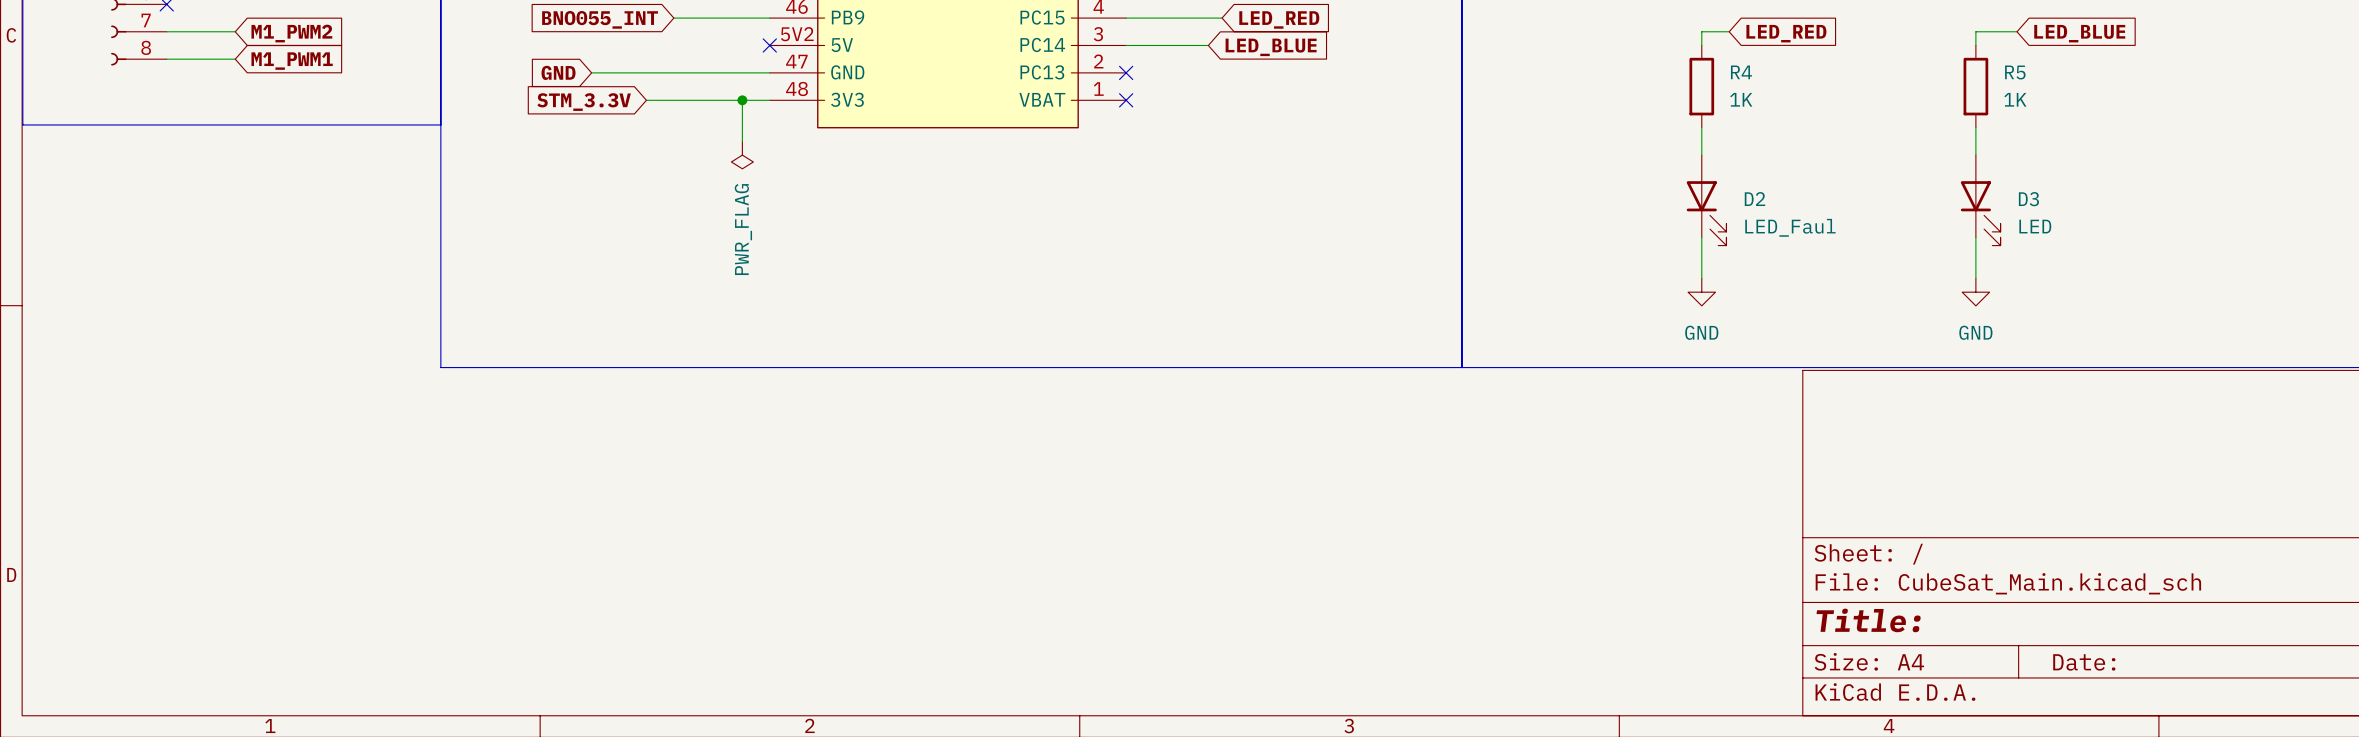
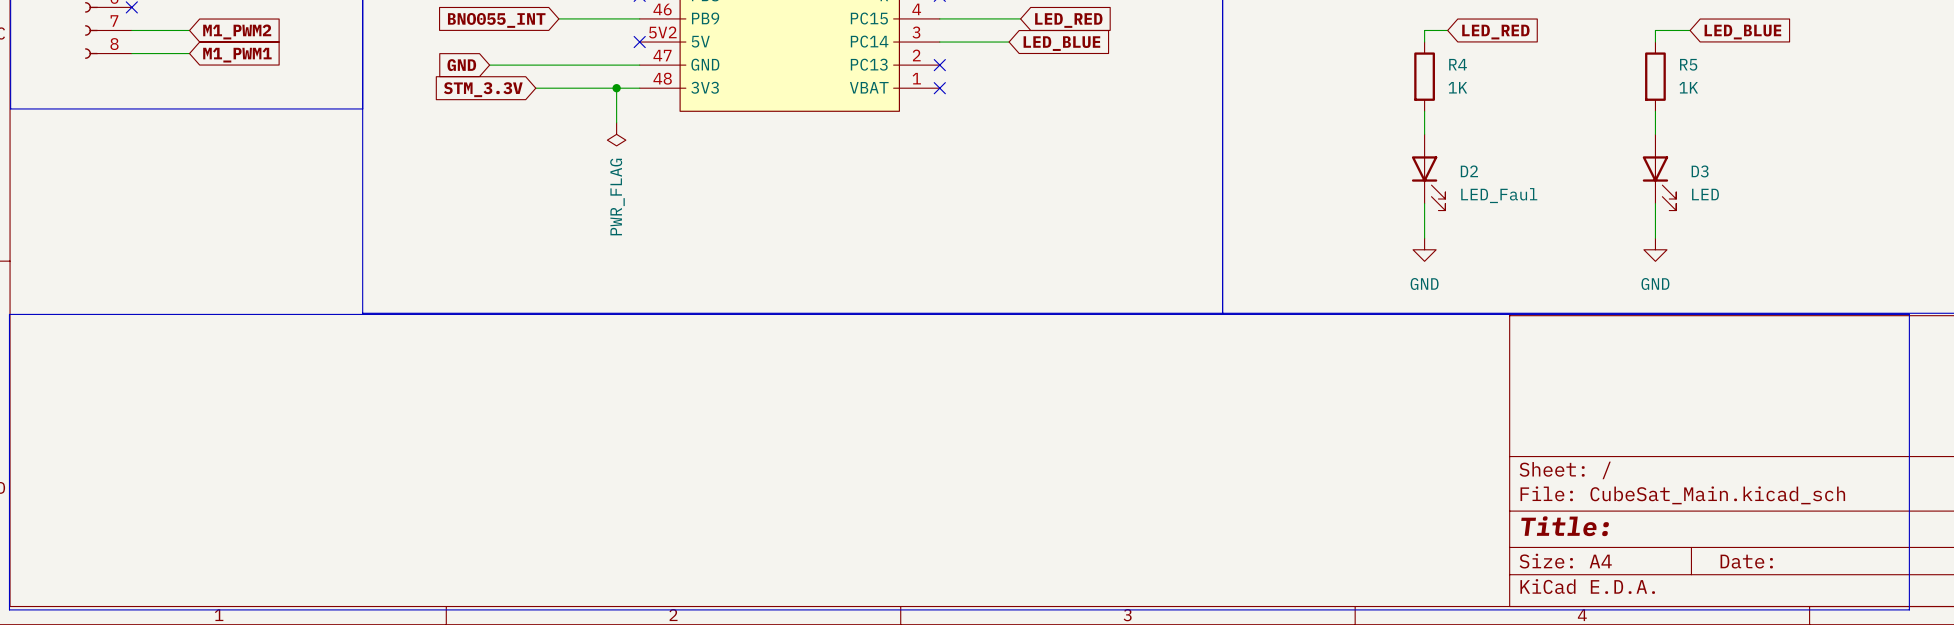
line: none -> (9, 314) (1909, 314) (1909, 609) (9, 609) (9, 314)

